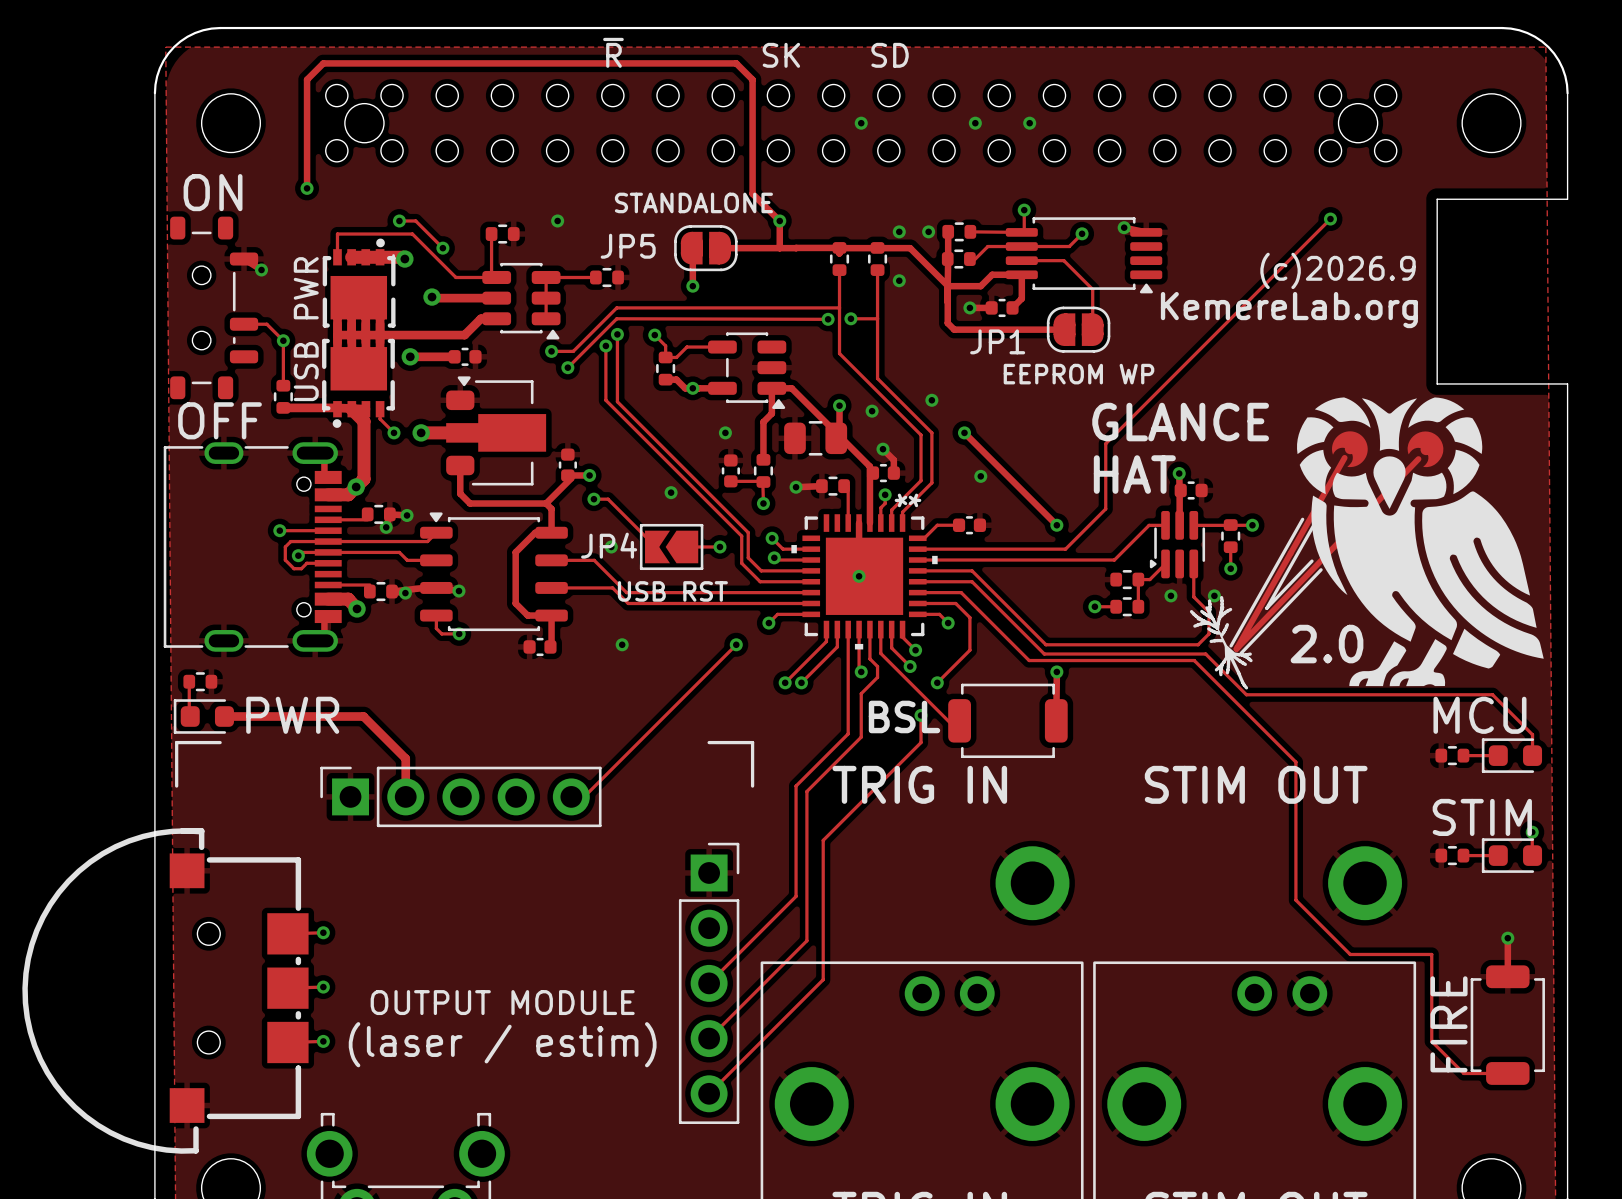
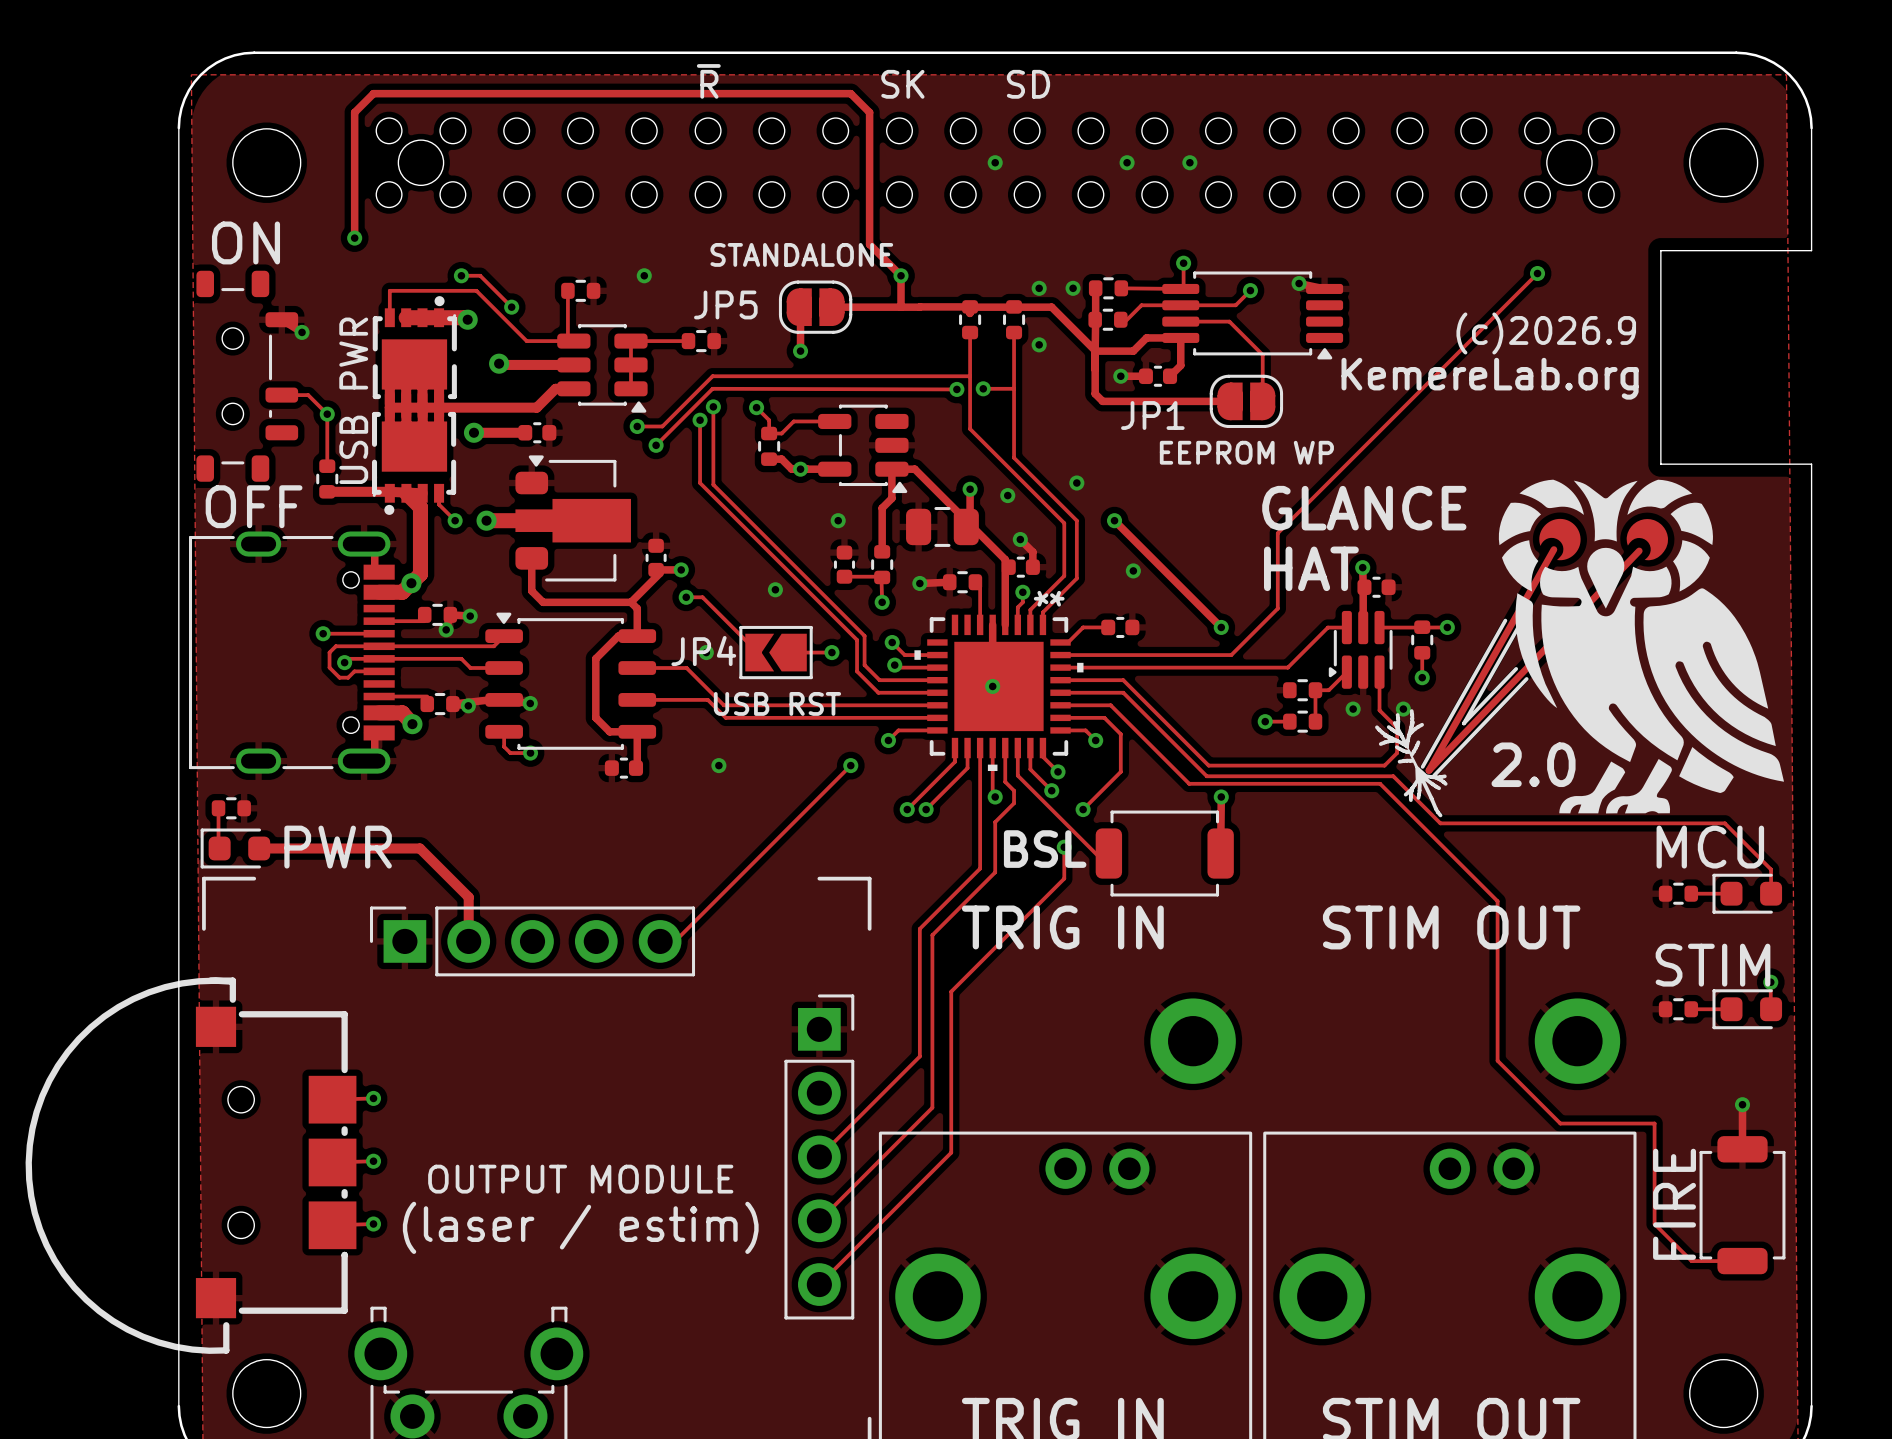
drawing: none -> [1375, 479, 1785, 818]
part: (1366, 543) -> none

